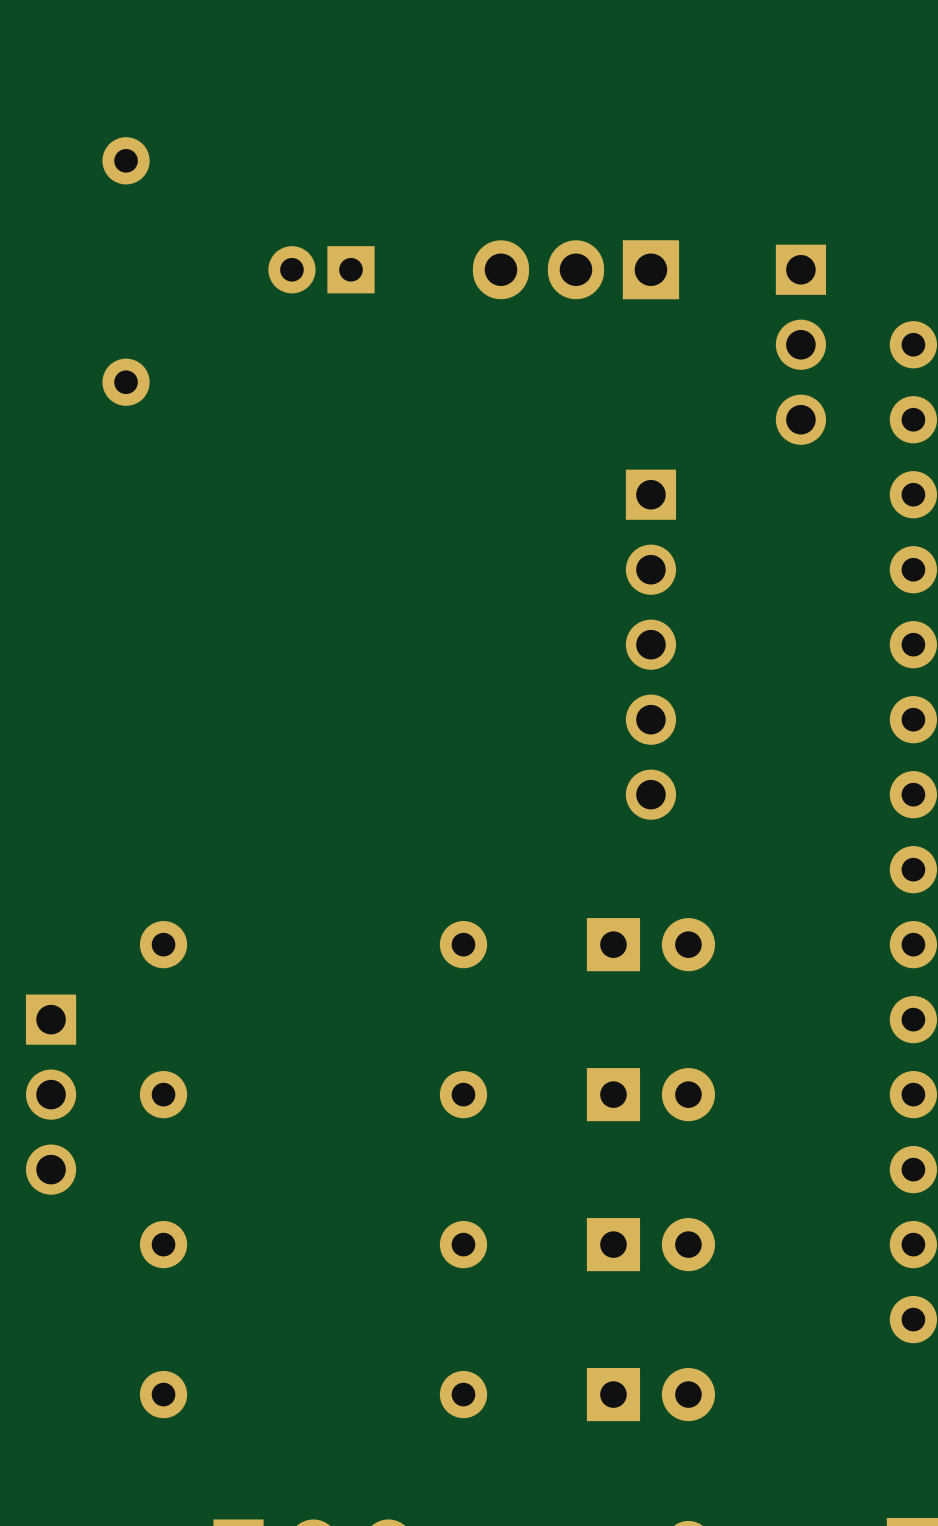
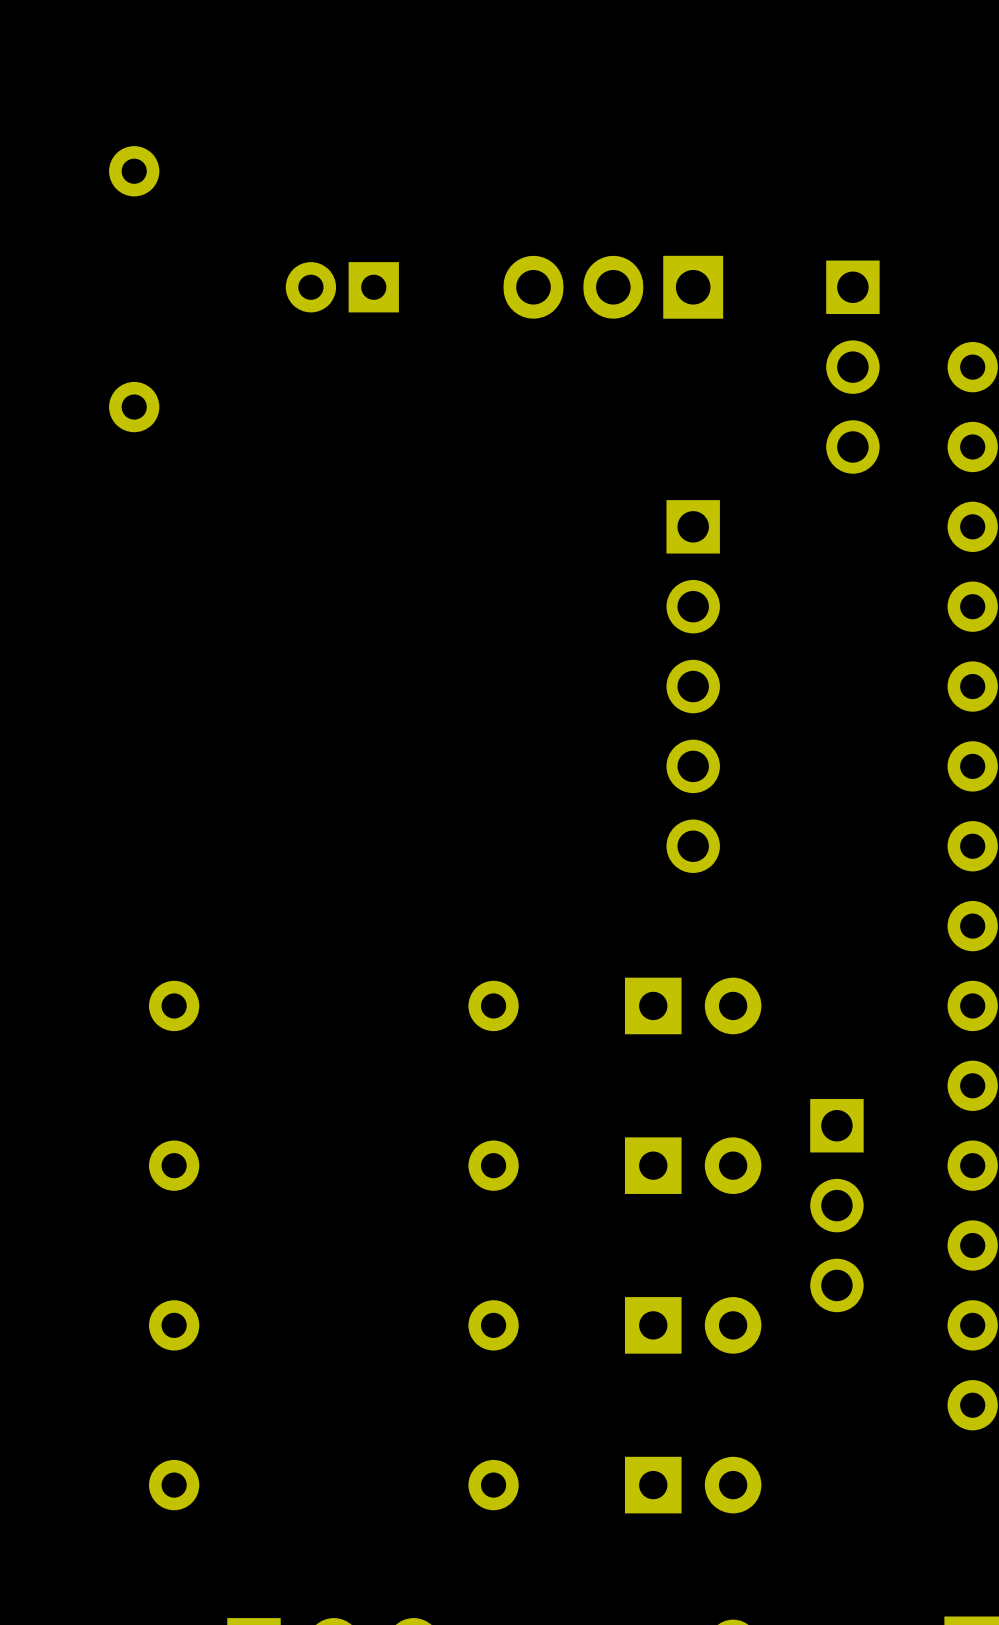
part position: (51, 1094) -> (836, 1205)

